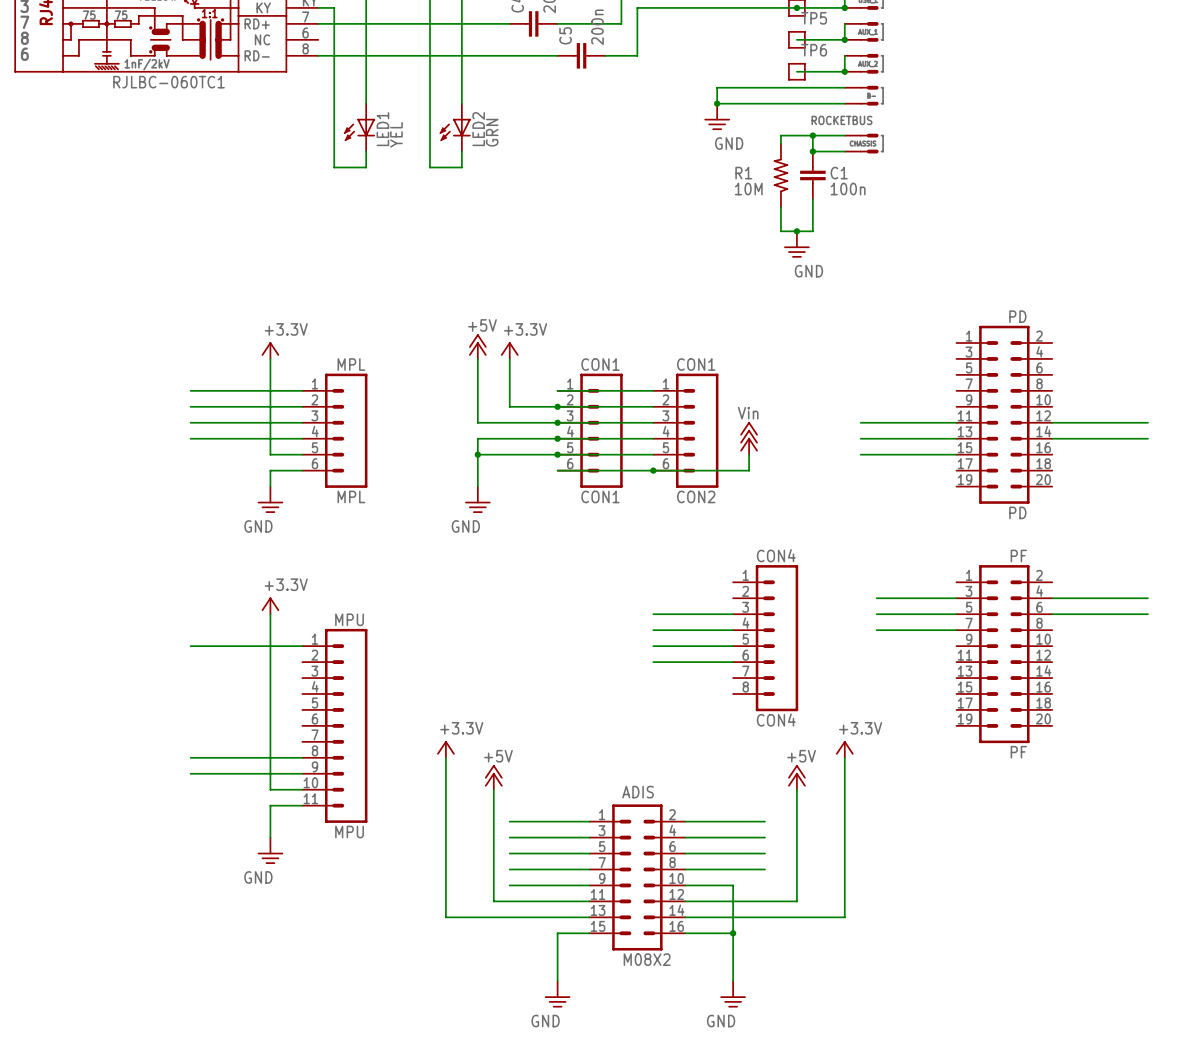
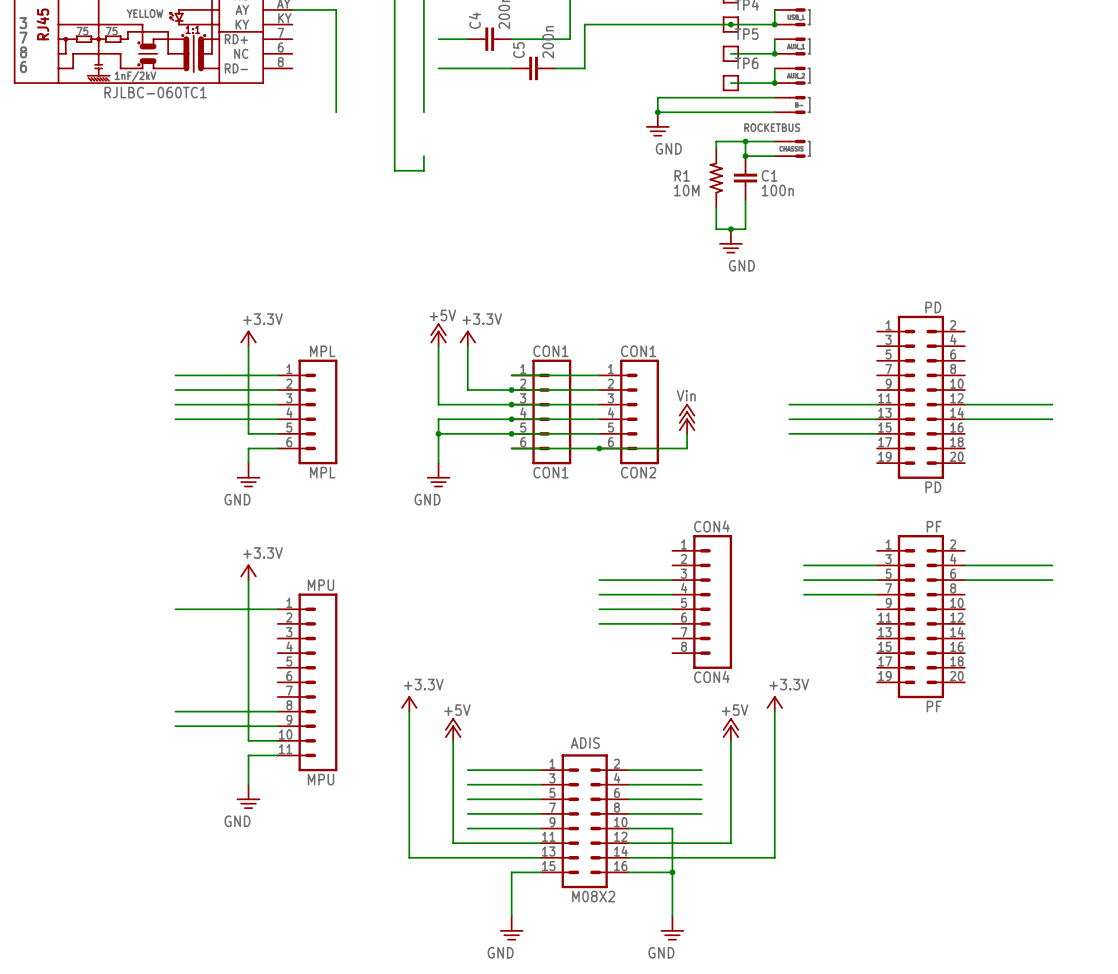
wire: (318, 7) (334, 7) (334, 167) (366, 167) (366, 151) -> none
wire: (318, 23) (477, 23) -> none
wire: (318, 55) (477, 55) -> none
LED1: YEL (359, 127) -> none
LED2: GRN (455, 127) -> none

